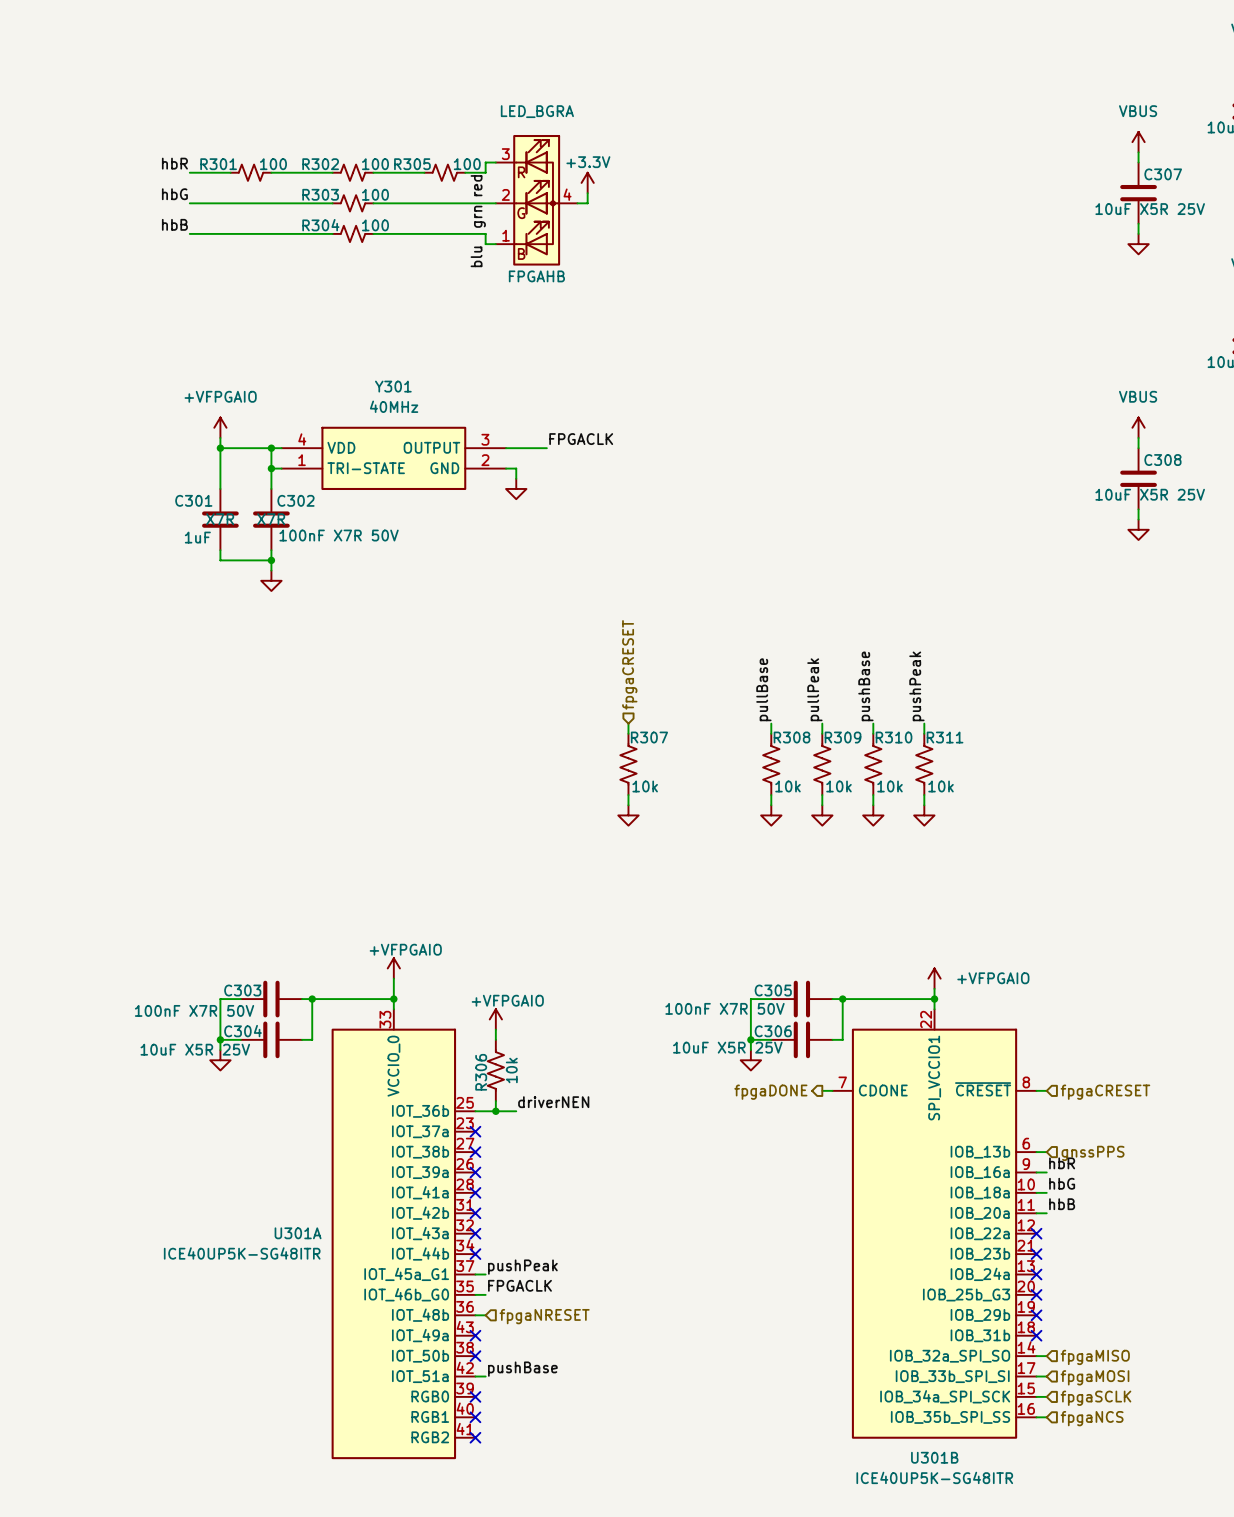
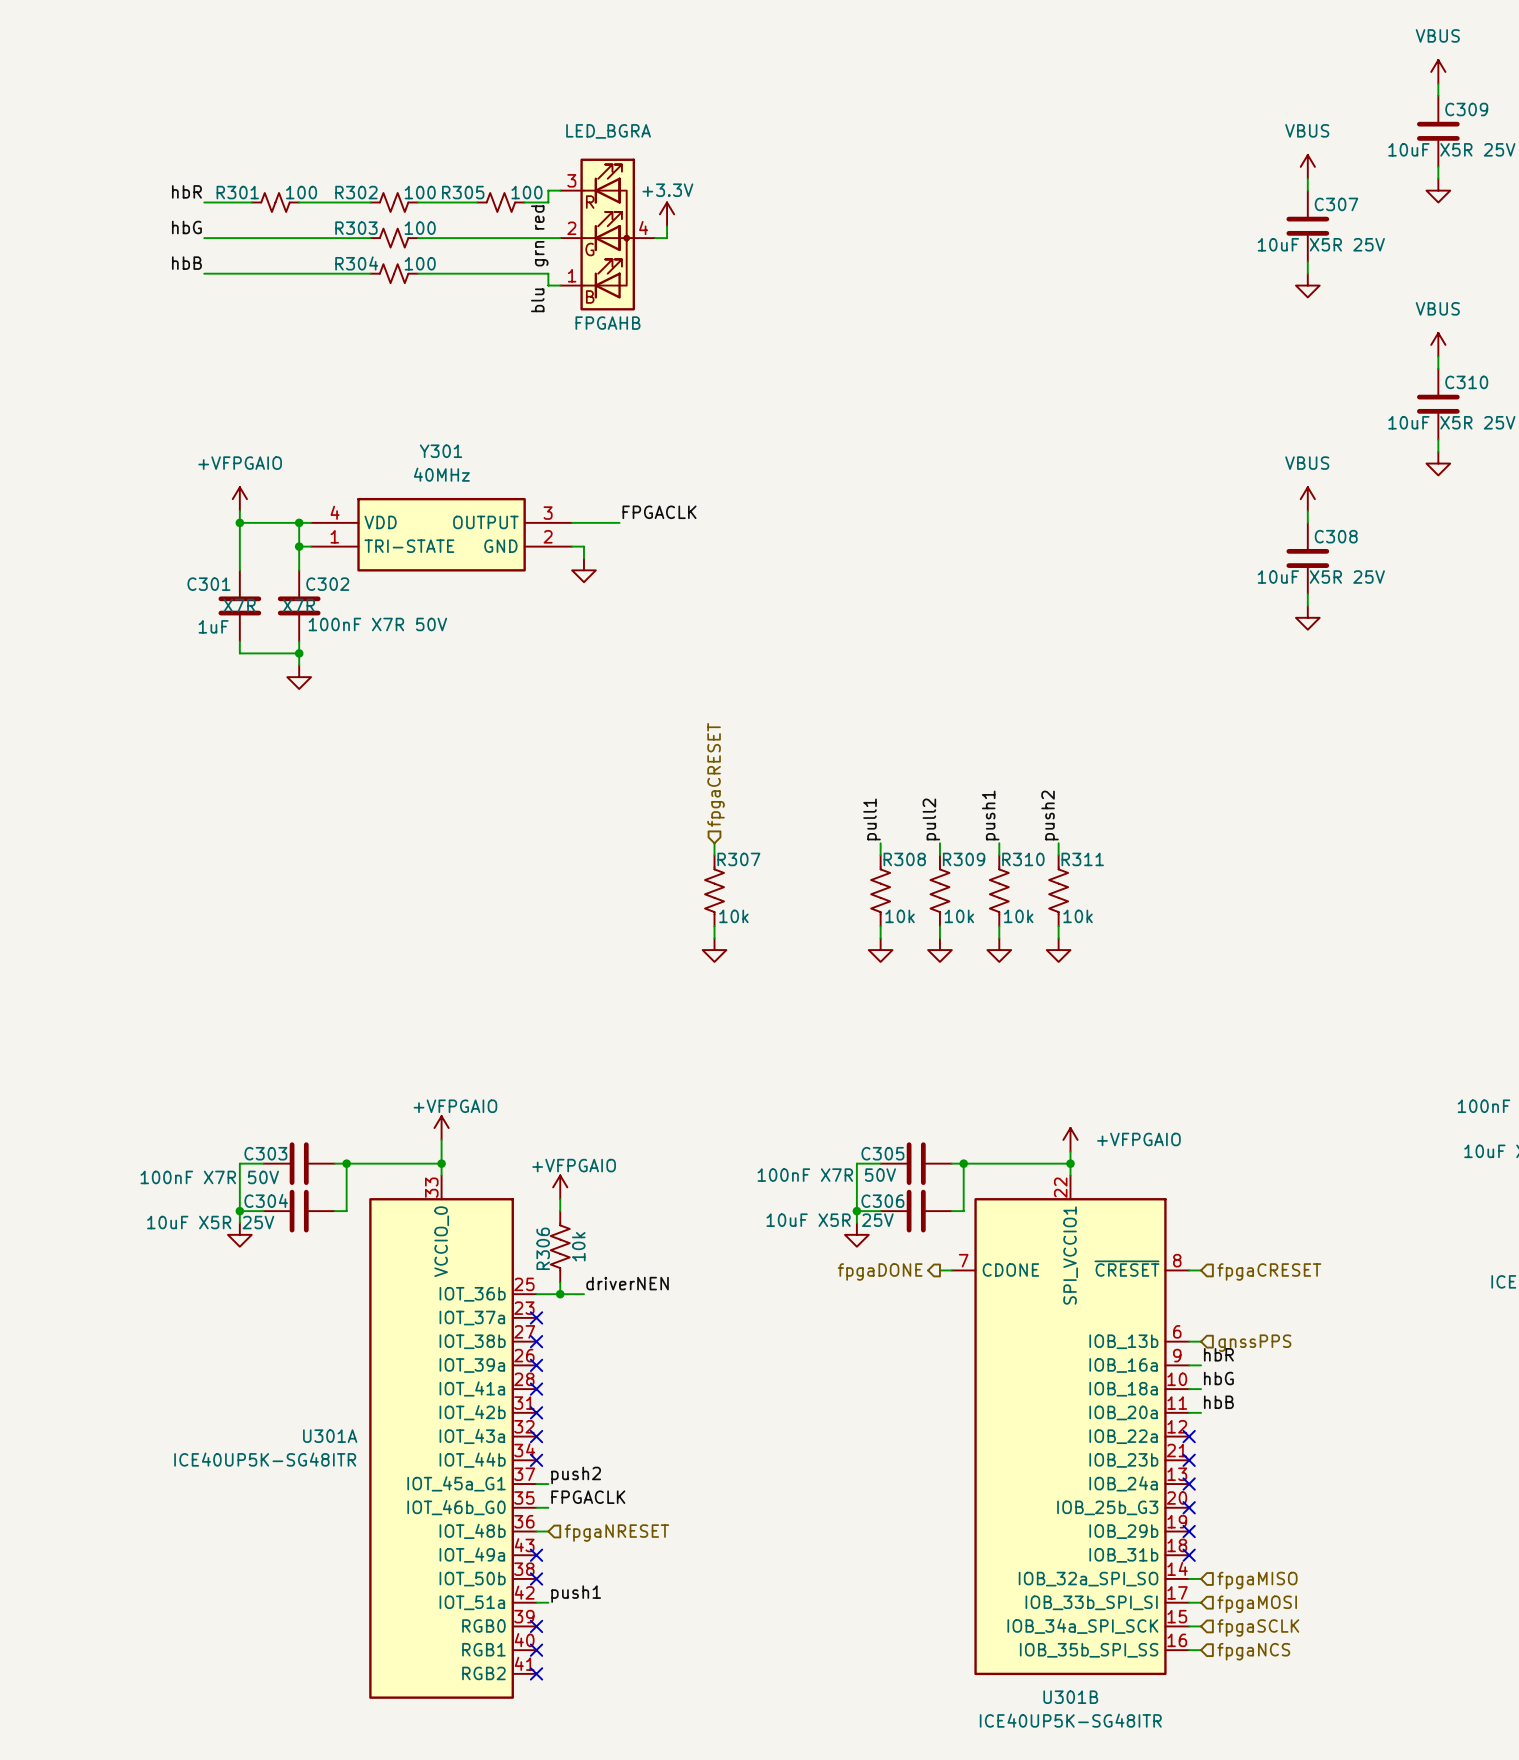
label: pushBase (865, 686) -> push1 (990, 815)
label: pushPeak (916, 686) -> push2 (1050, 815)
label: pullBase (763, 689) -> pull1 (872, 819)
label: pullPeak (814, 689) -> pull2 (931, 819)
label: pushPeak (522, 1267) -> push2 (576, 1475)
label: pushBase (522, 1369) -> push1 (576, 1594)

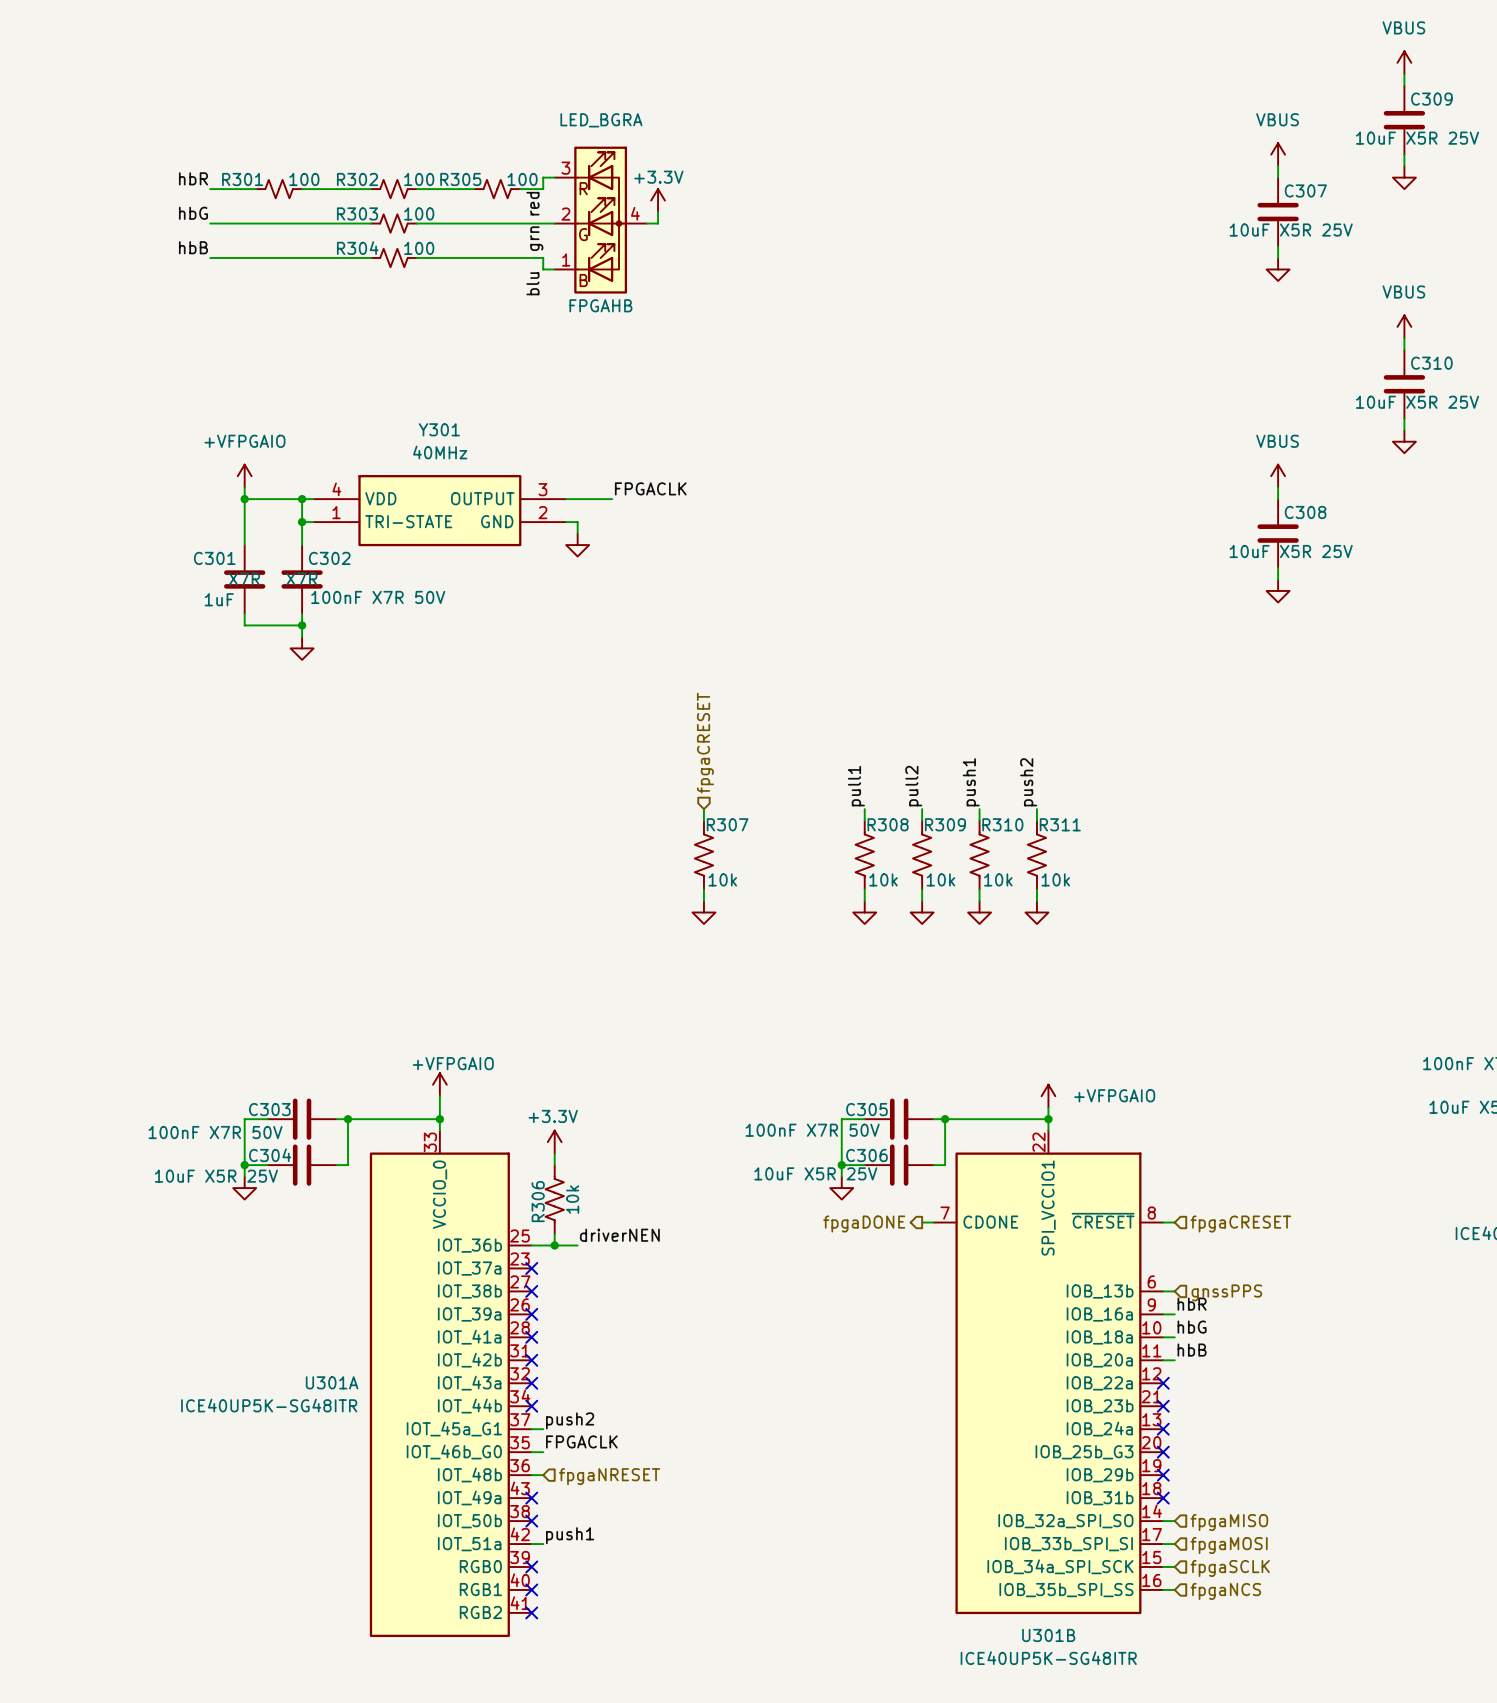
power symbol: +VFPGAIO (560, 1187) -> +3.3V (554, 1142)

